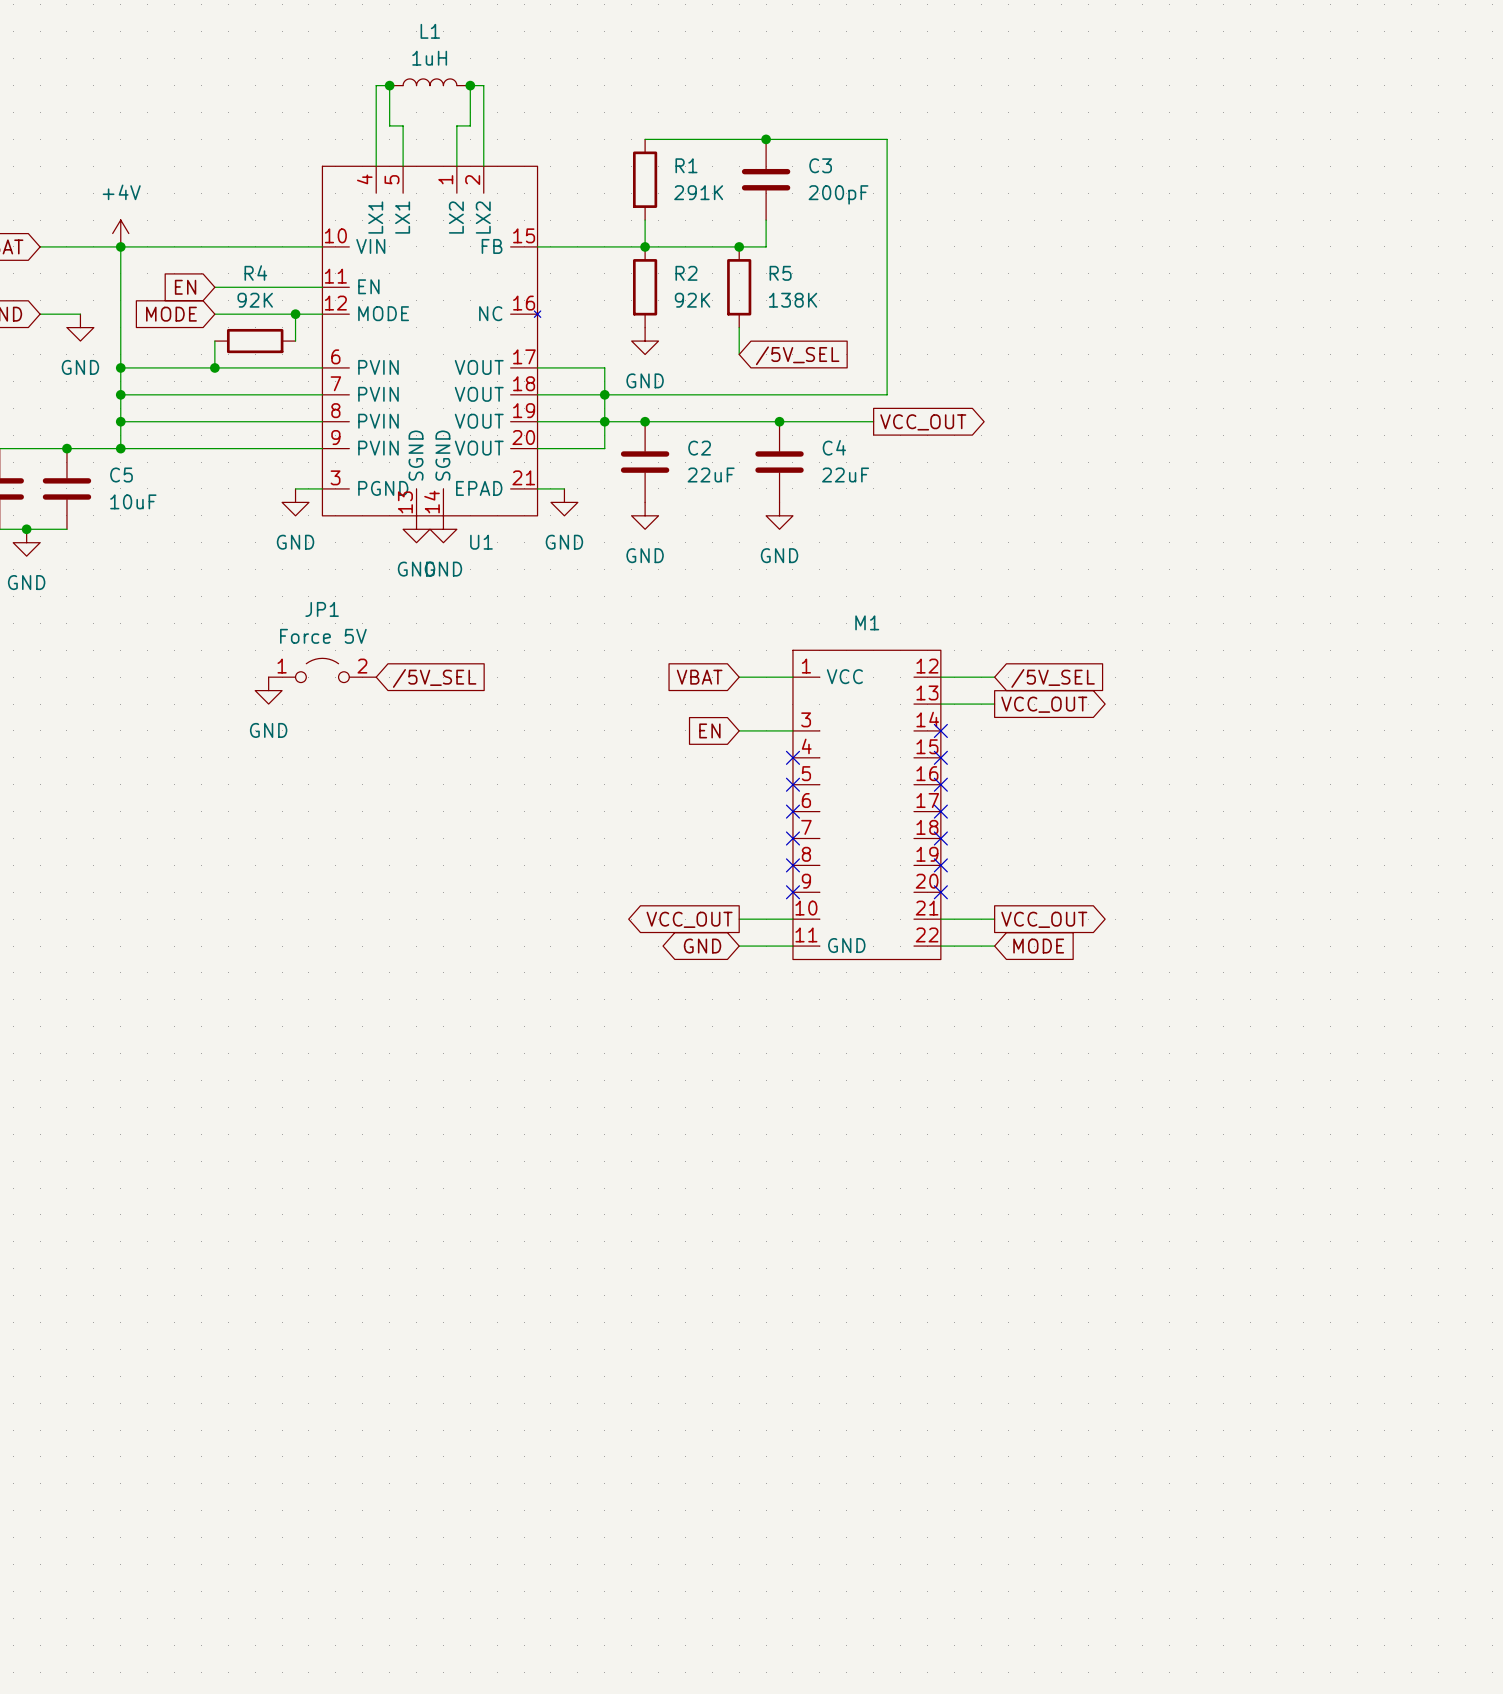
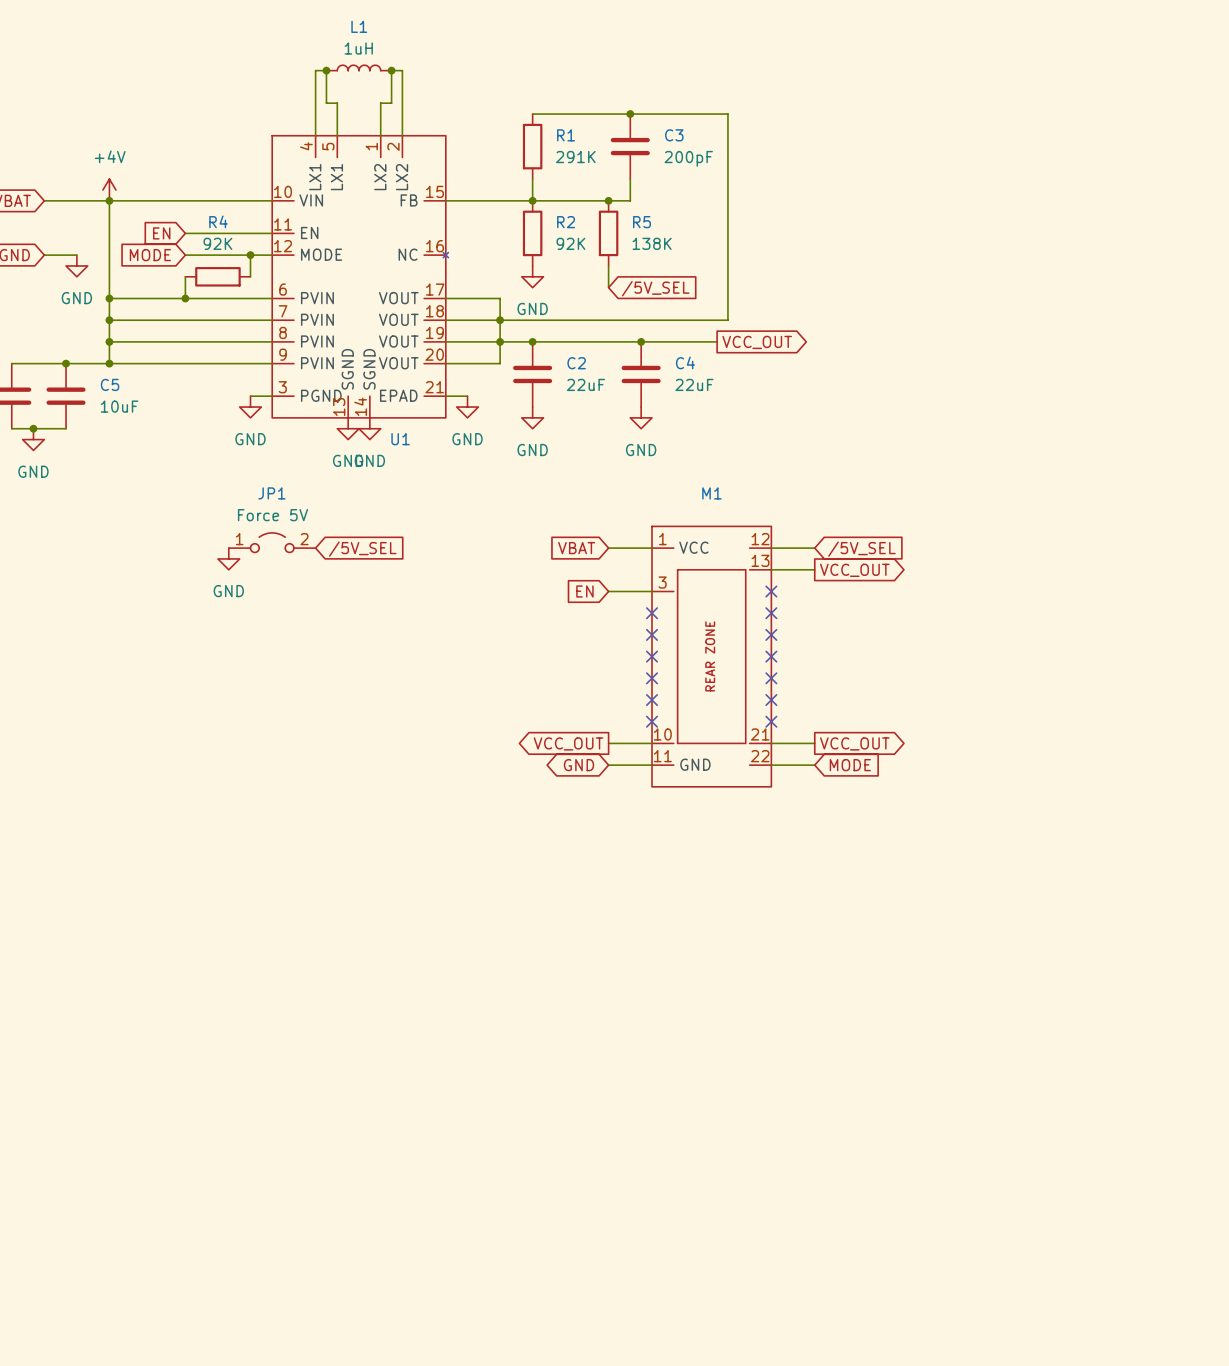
M1 symbol: [792, 650, 941, 960] -> [652, 526, 772, 787]

